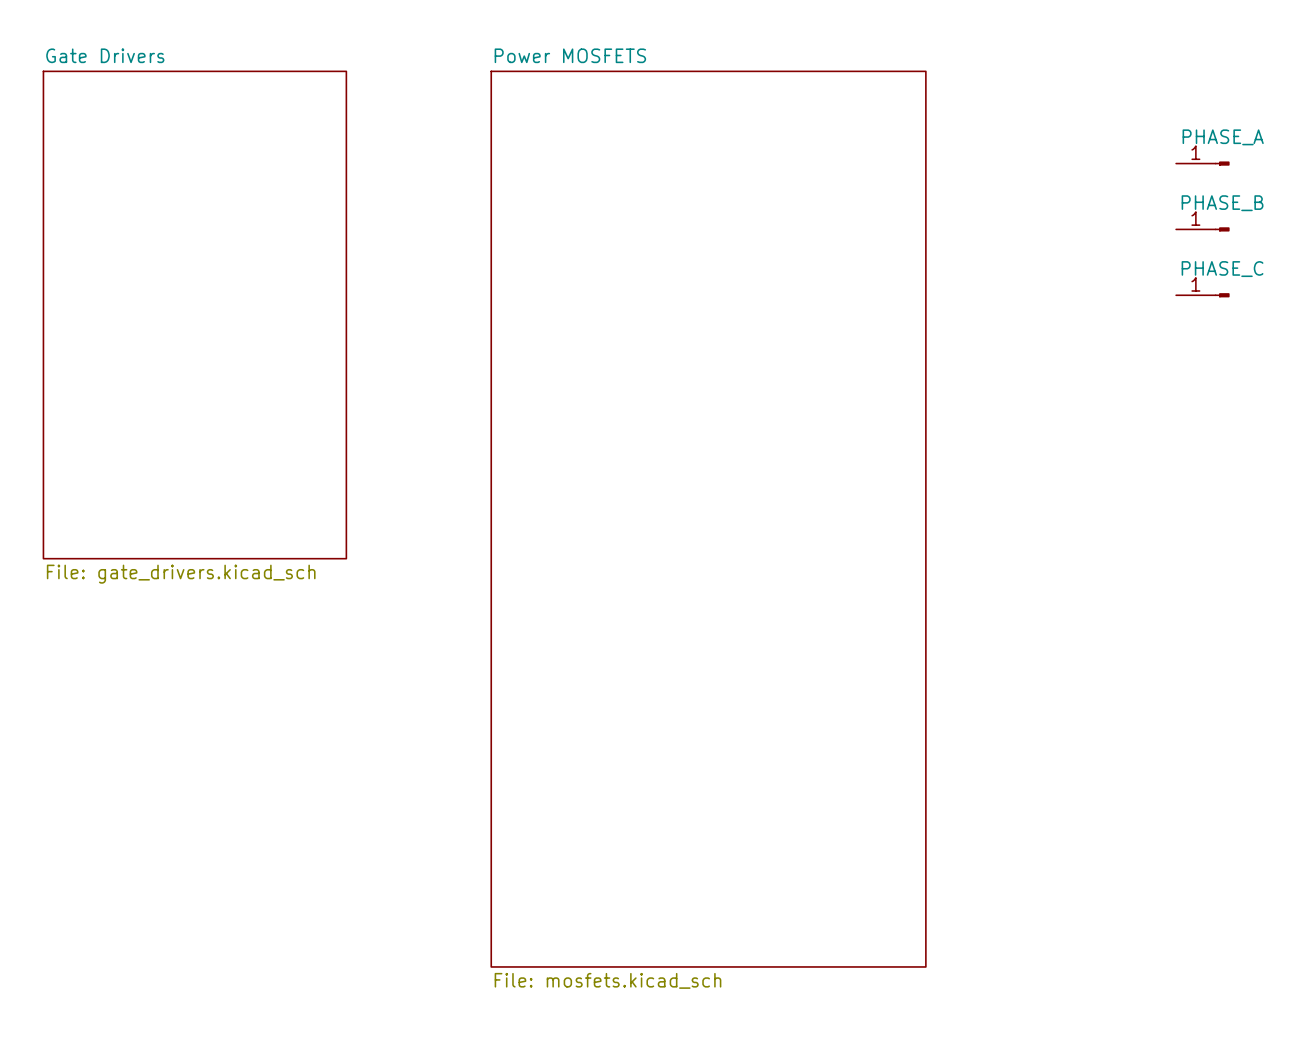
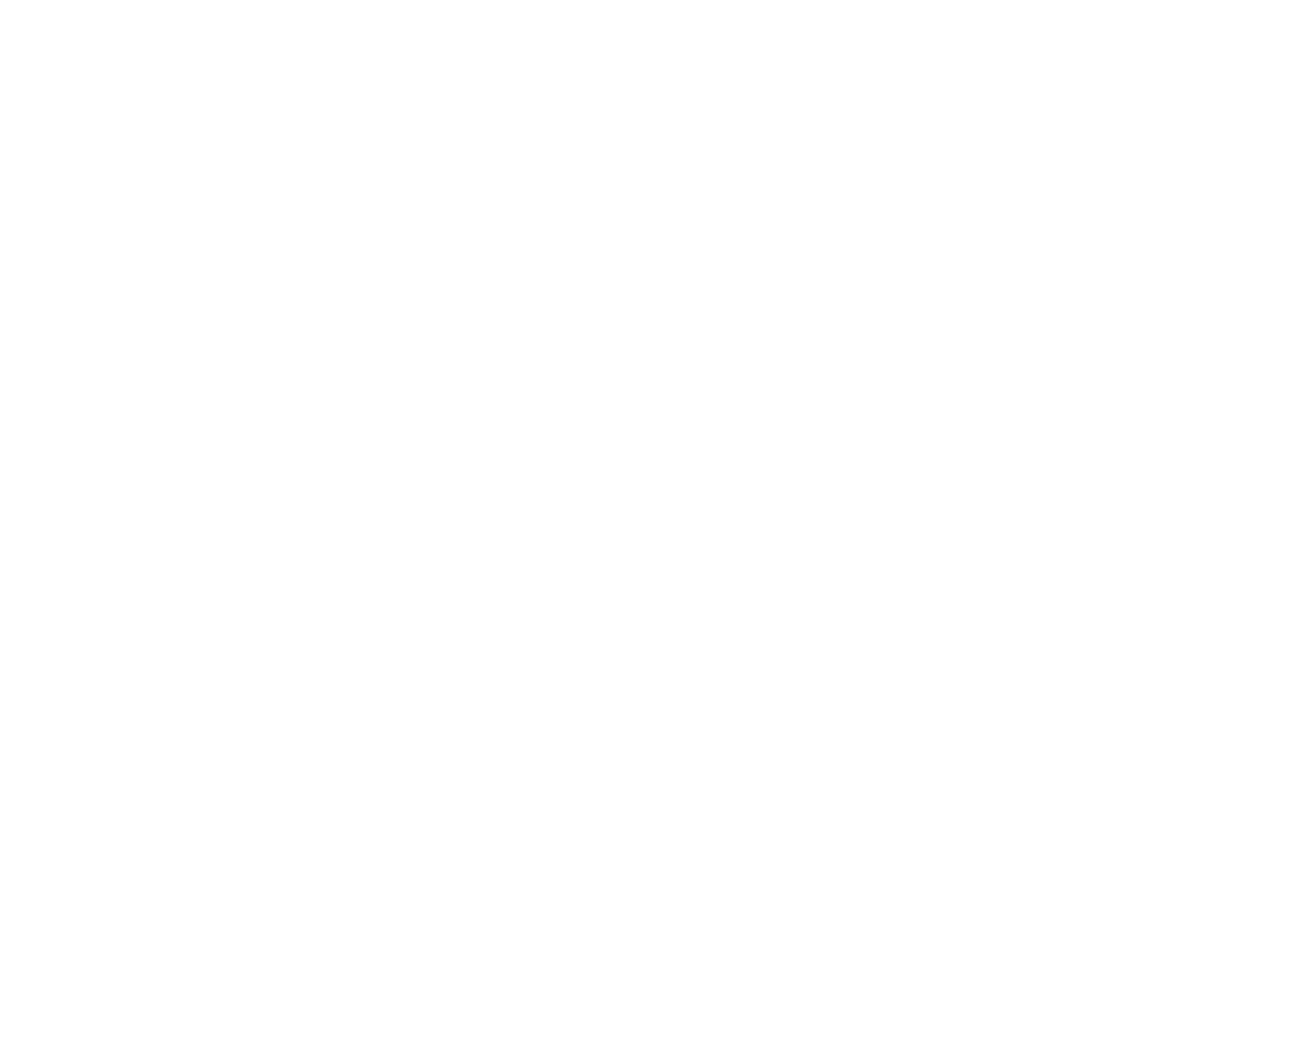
part: PHASE_A (1202, 163) -> none
part: PHASE_B (1202, 229) -> none
part: PHASE_C (1202, 295) -> none
sheet Gate Drivers: File: gate_drivers.kicad_sch (194, 315) -> none
sheet Power MOSFETS: File: mosfets.kicad_sch (708, 519) -> none

